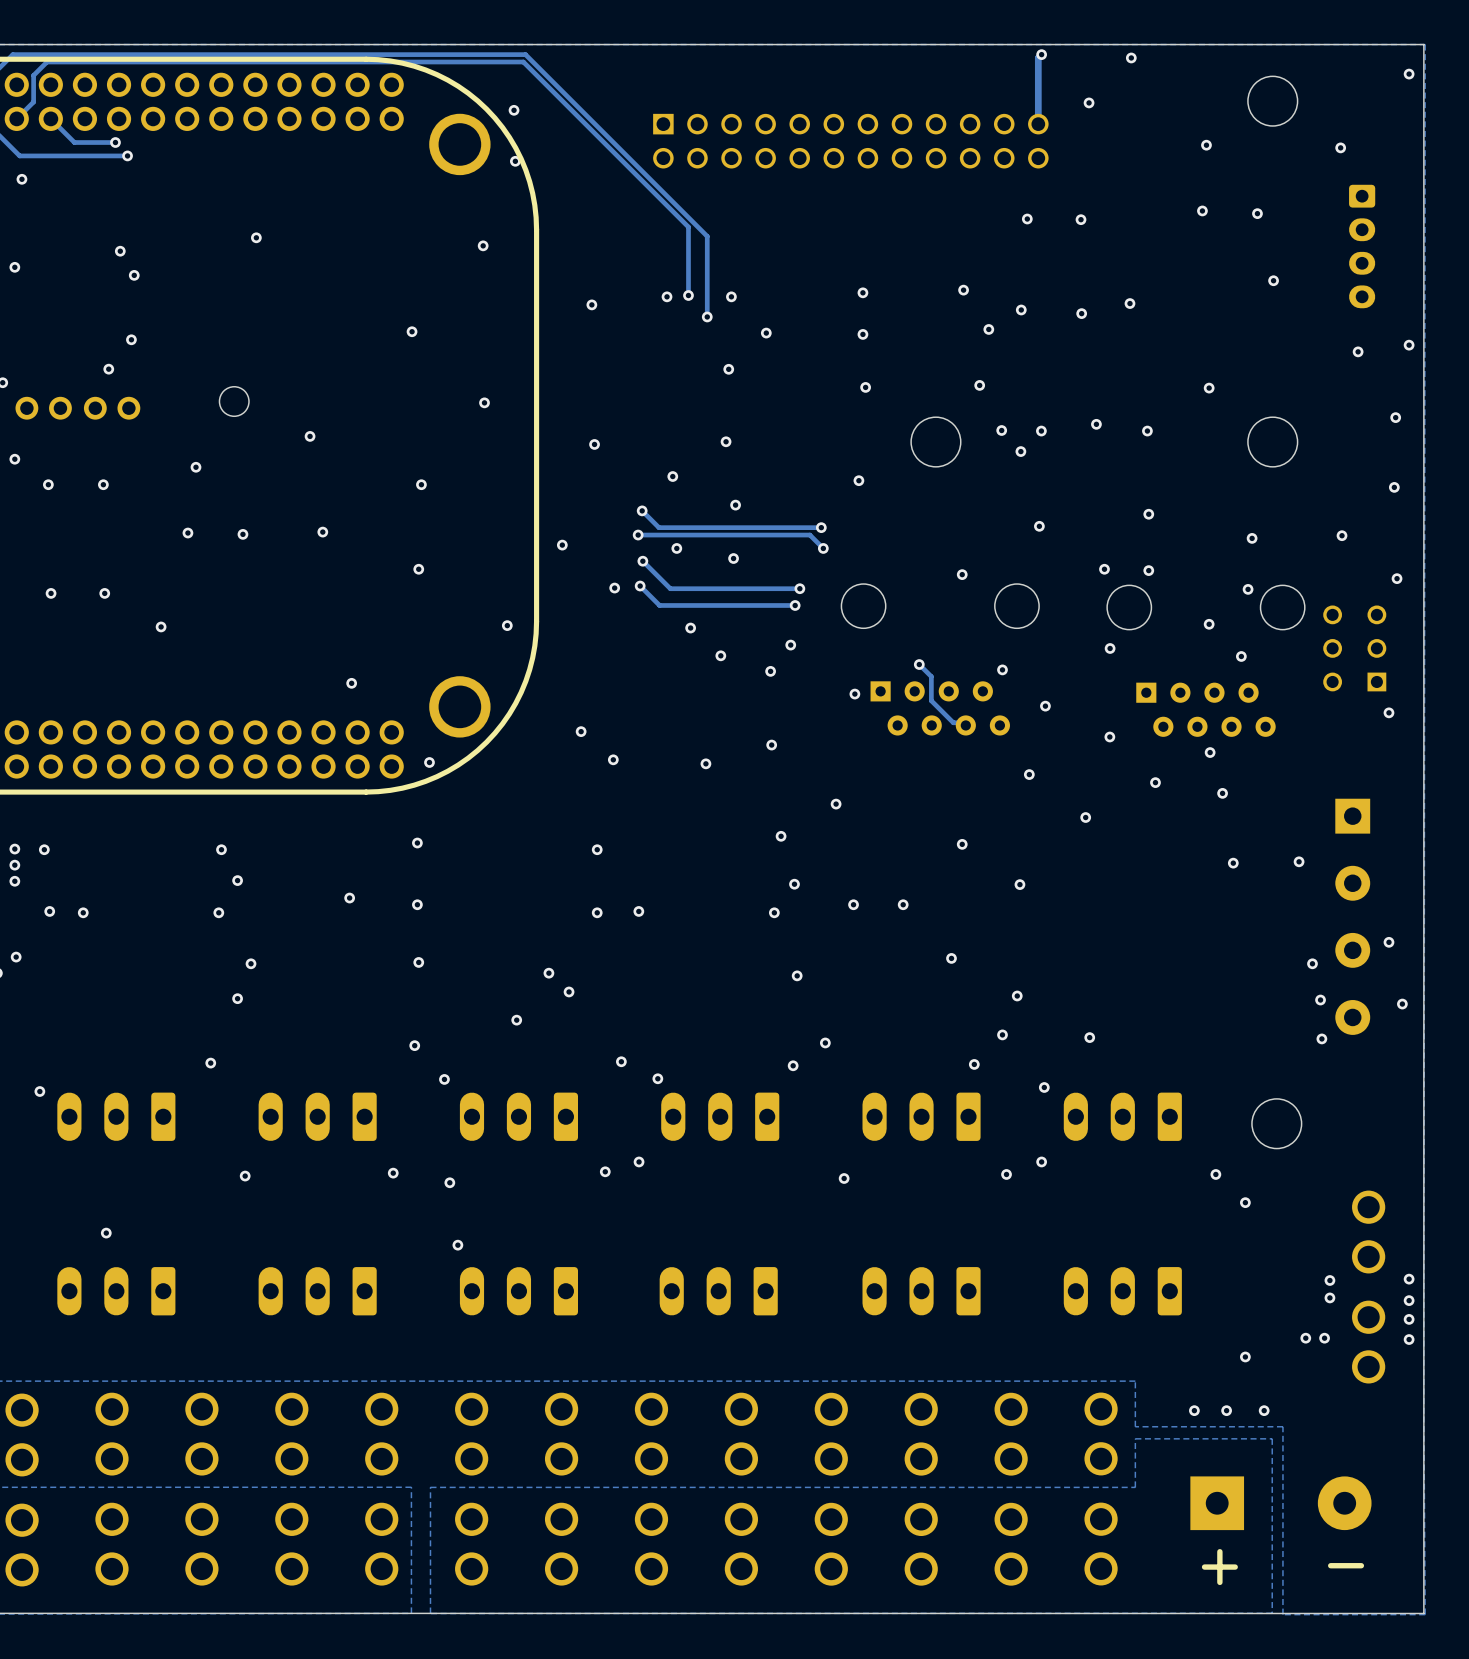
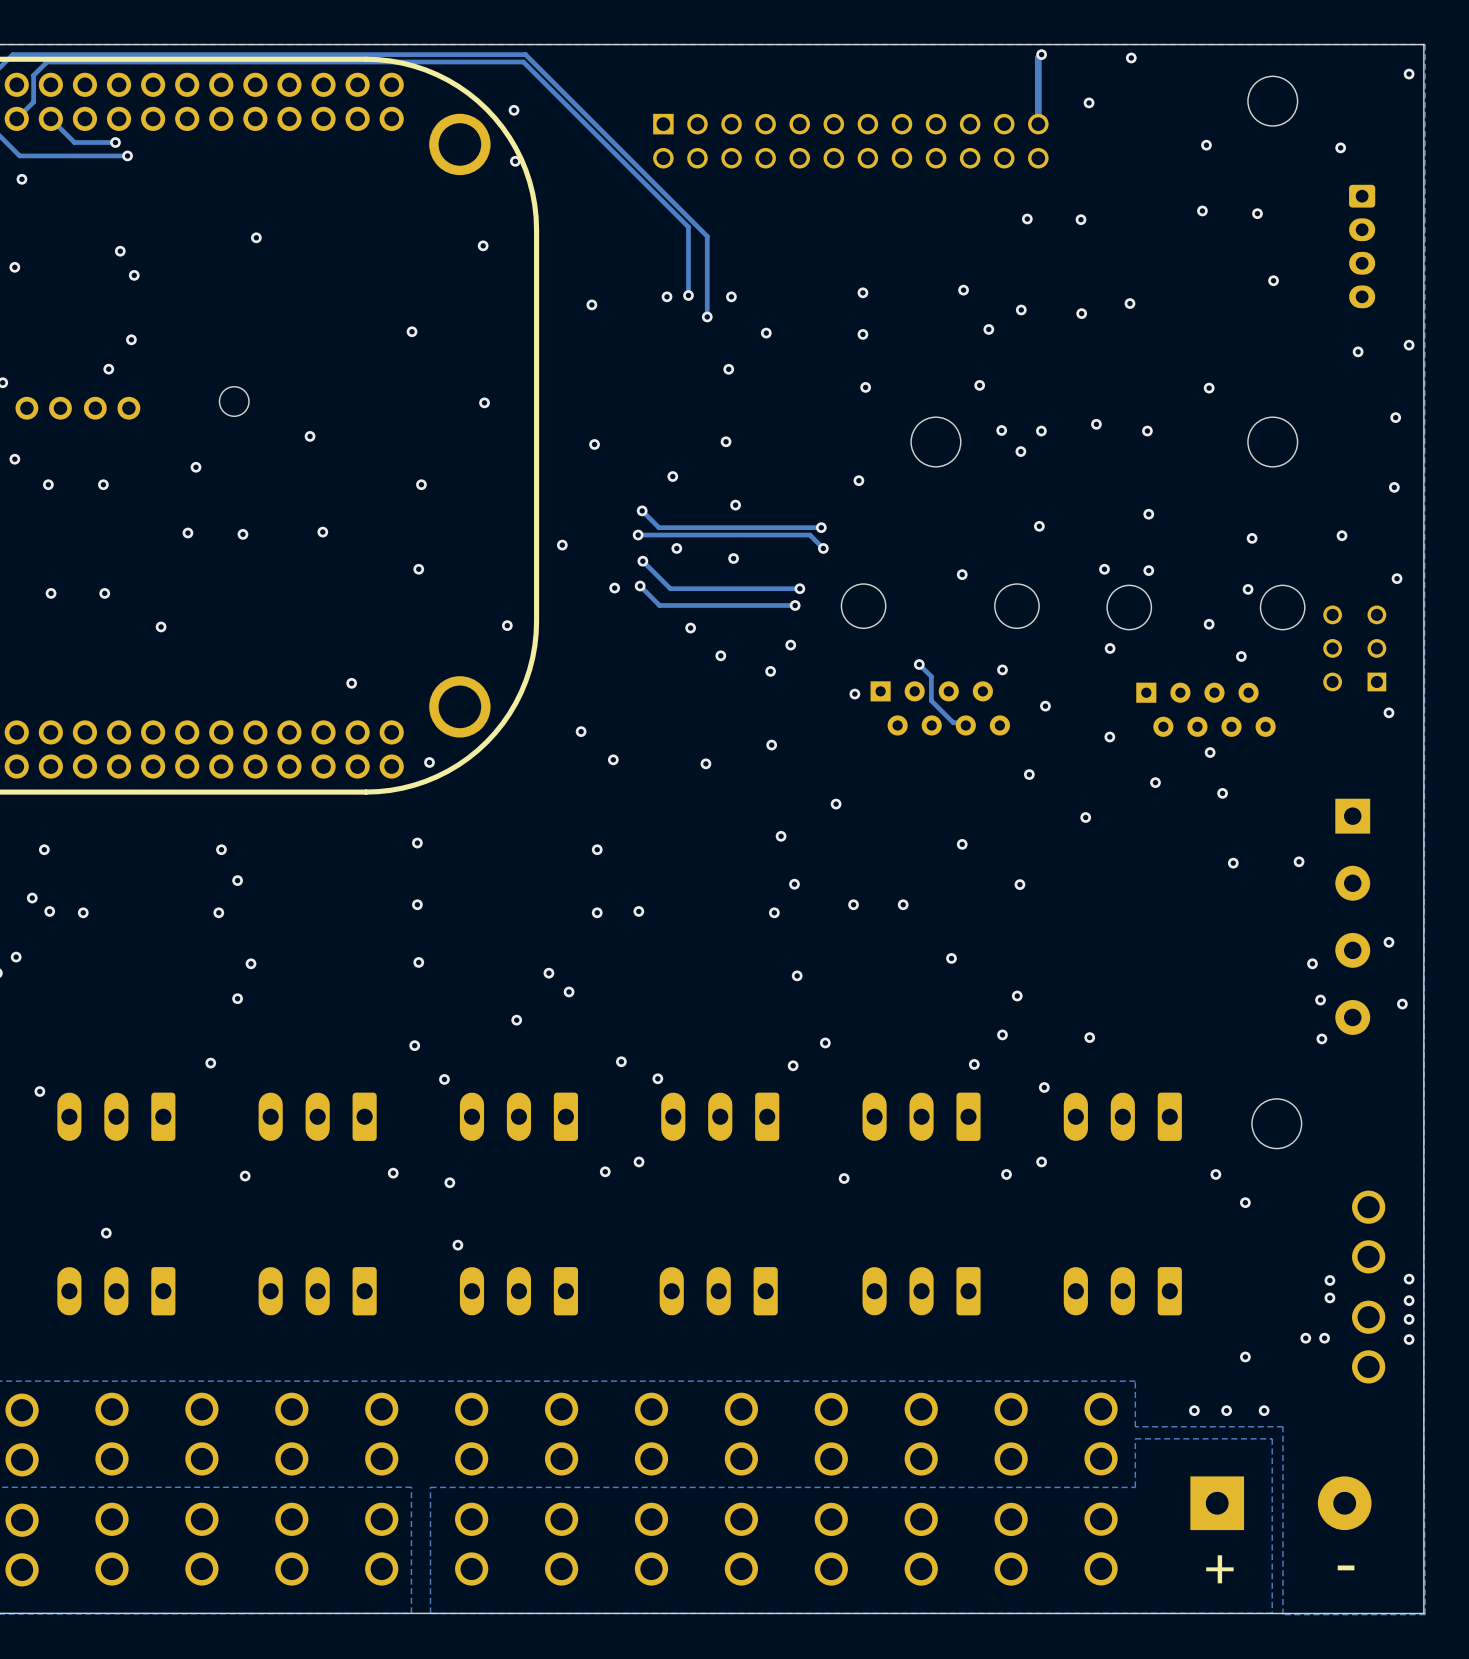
via: (14, 849) -> none
via: (14, 865) -> none
via: (14, 881) -> none
via: none -> (32, 898)
via: (349, 898) -> none

